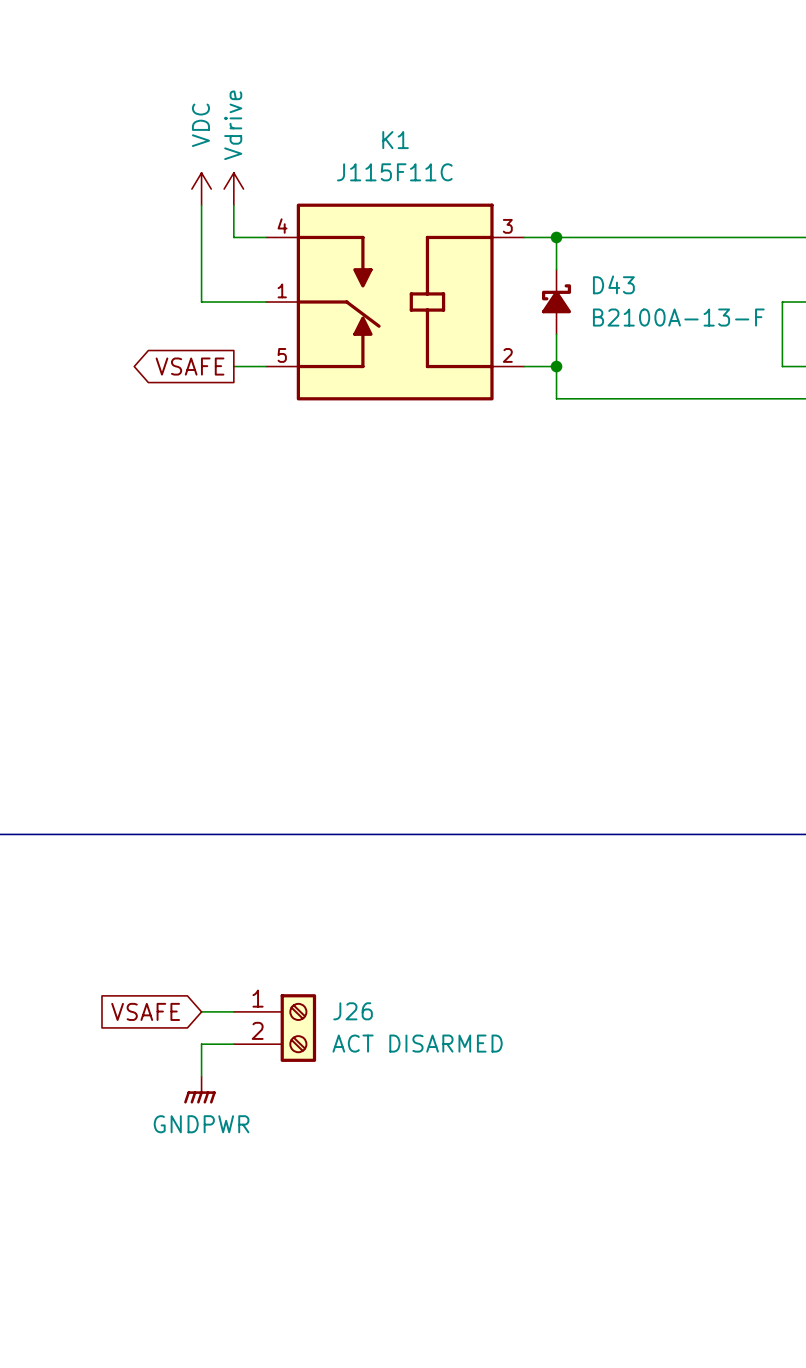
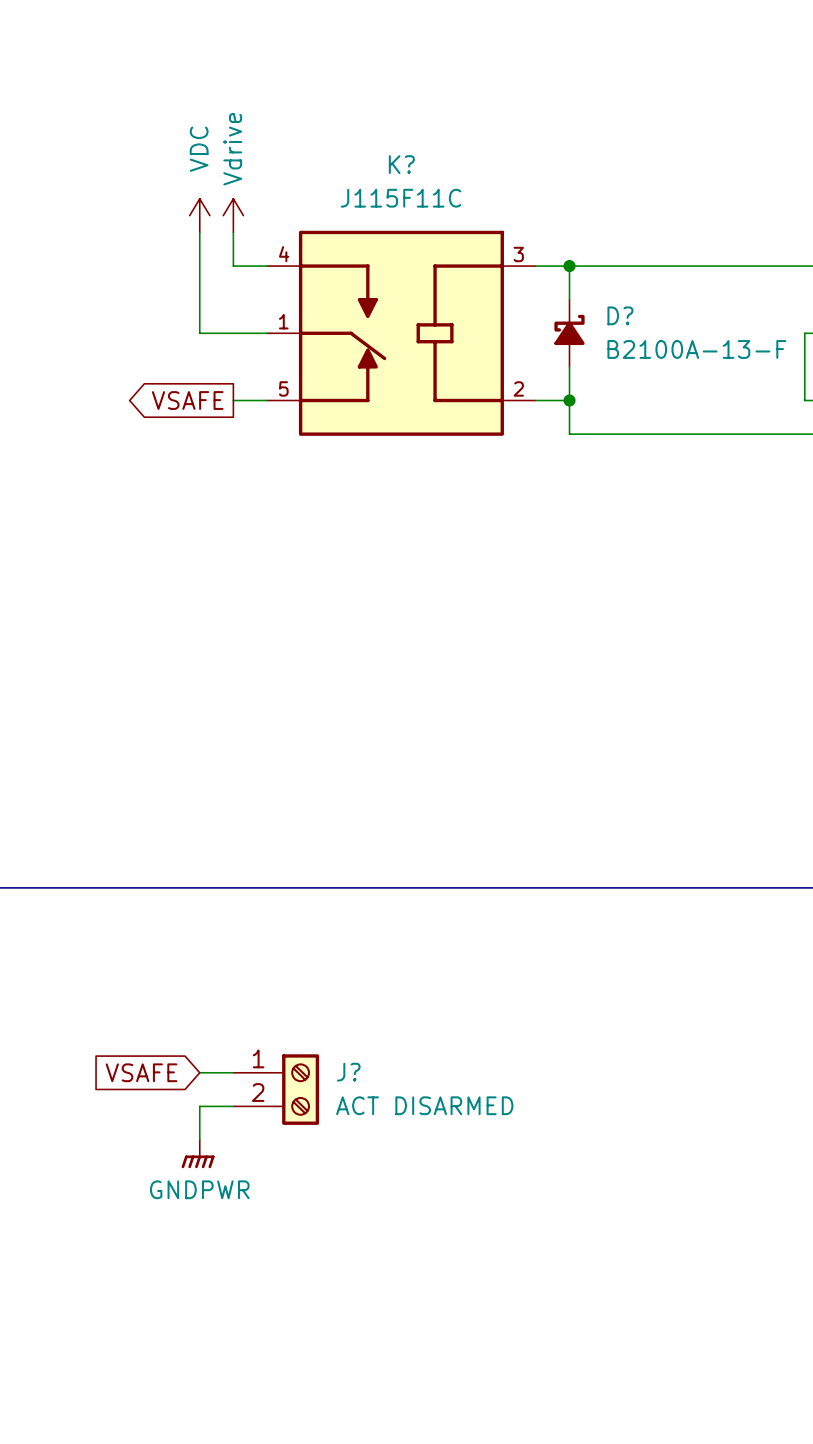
K1 name: K1 (395, 140) -> K? (401, 164)
D43 name: D43 (613, 284) -> D? (620, 315)
J26 name: J26 (353, 1011) -> J? (348, 1072)

